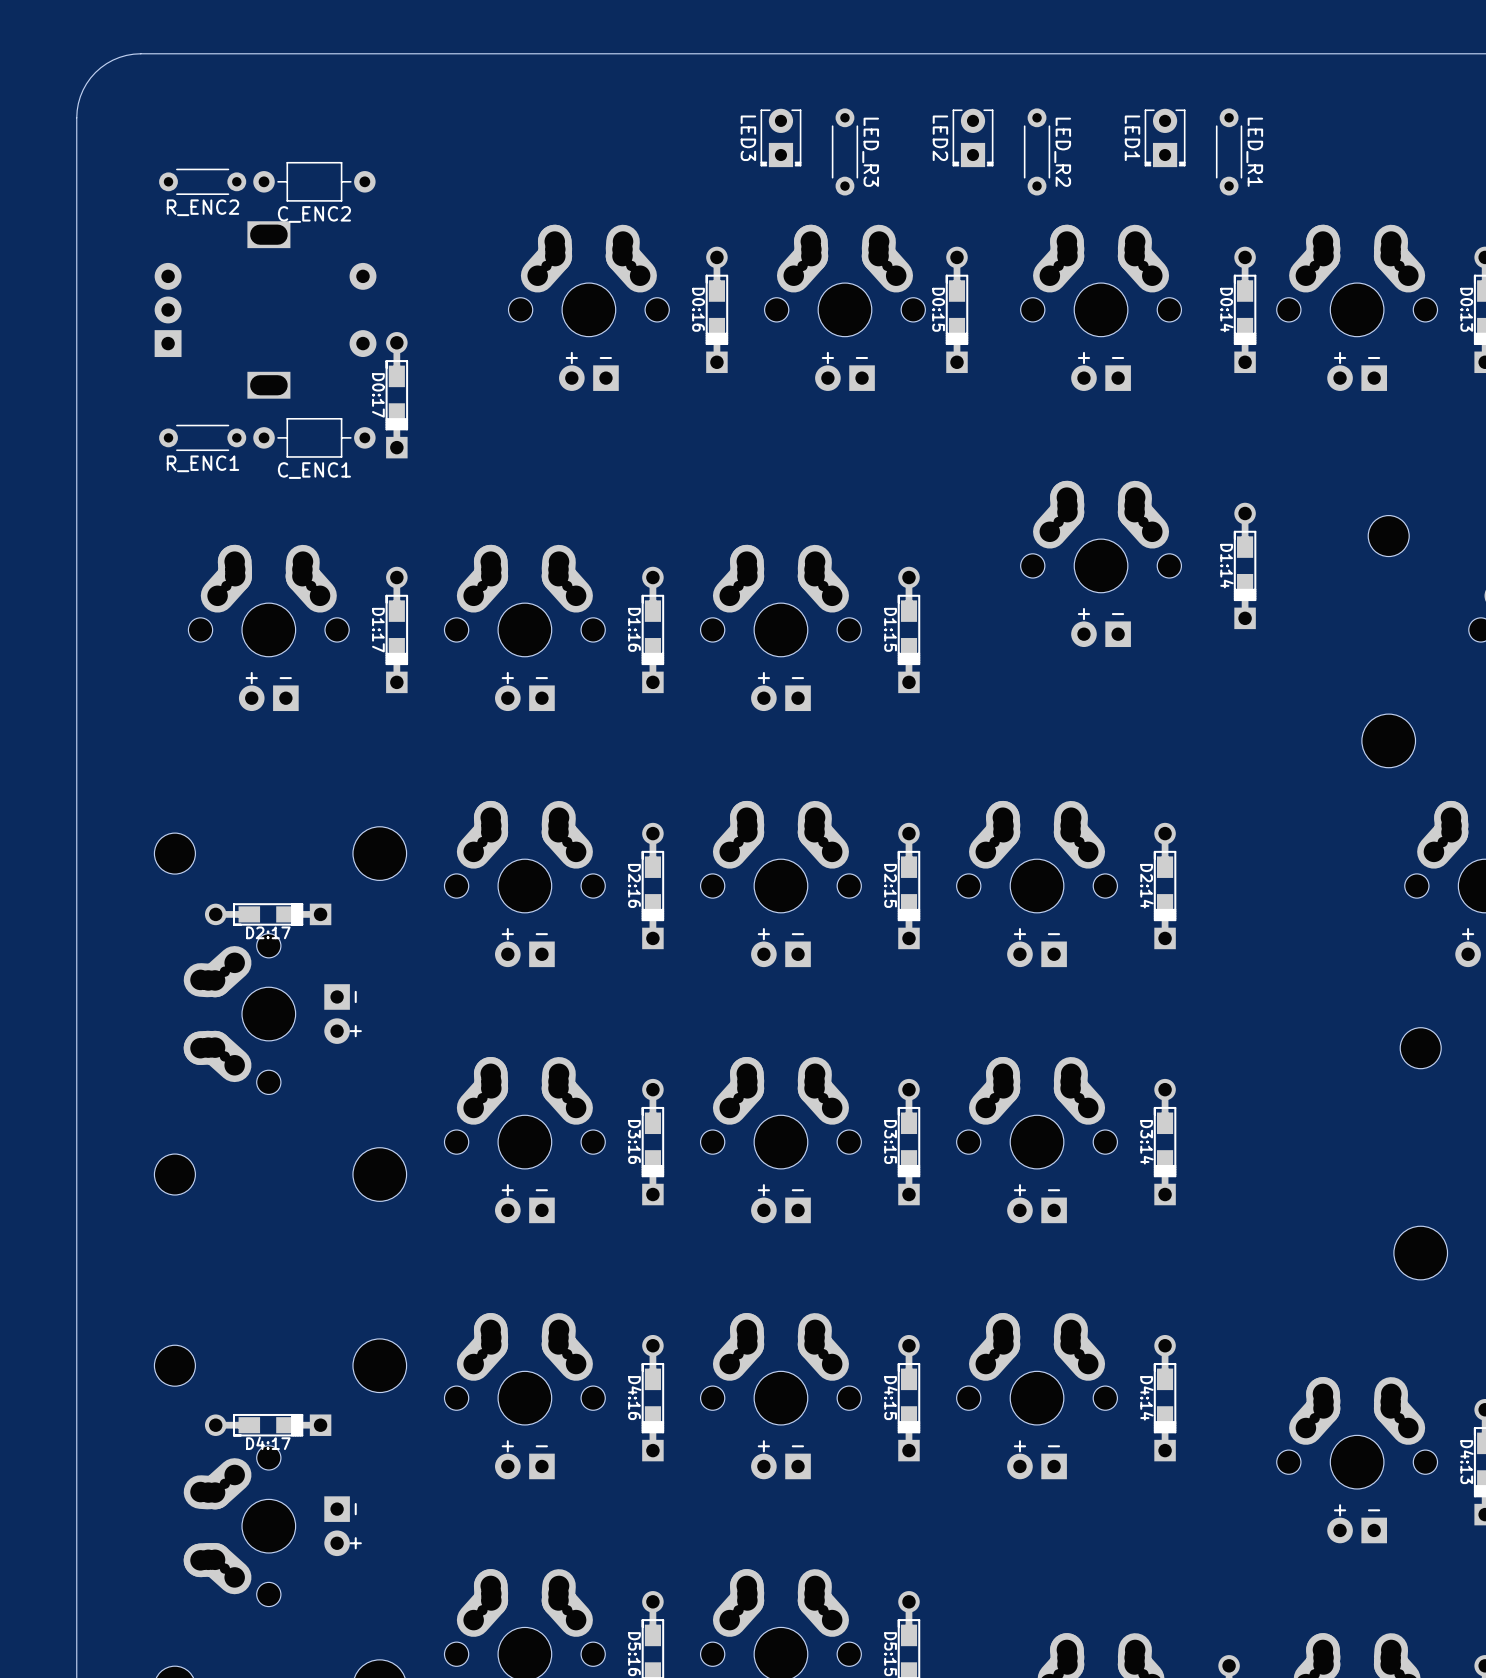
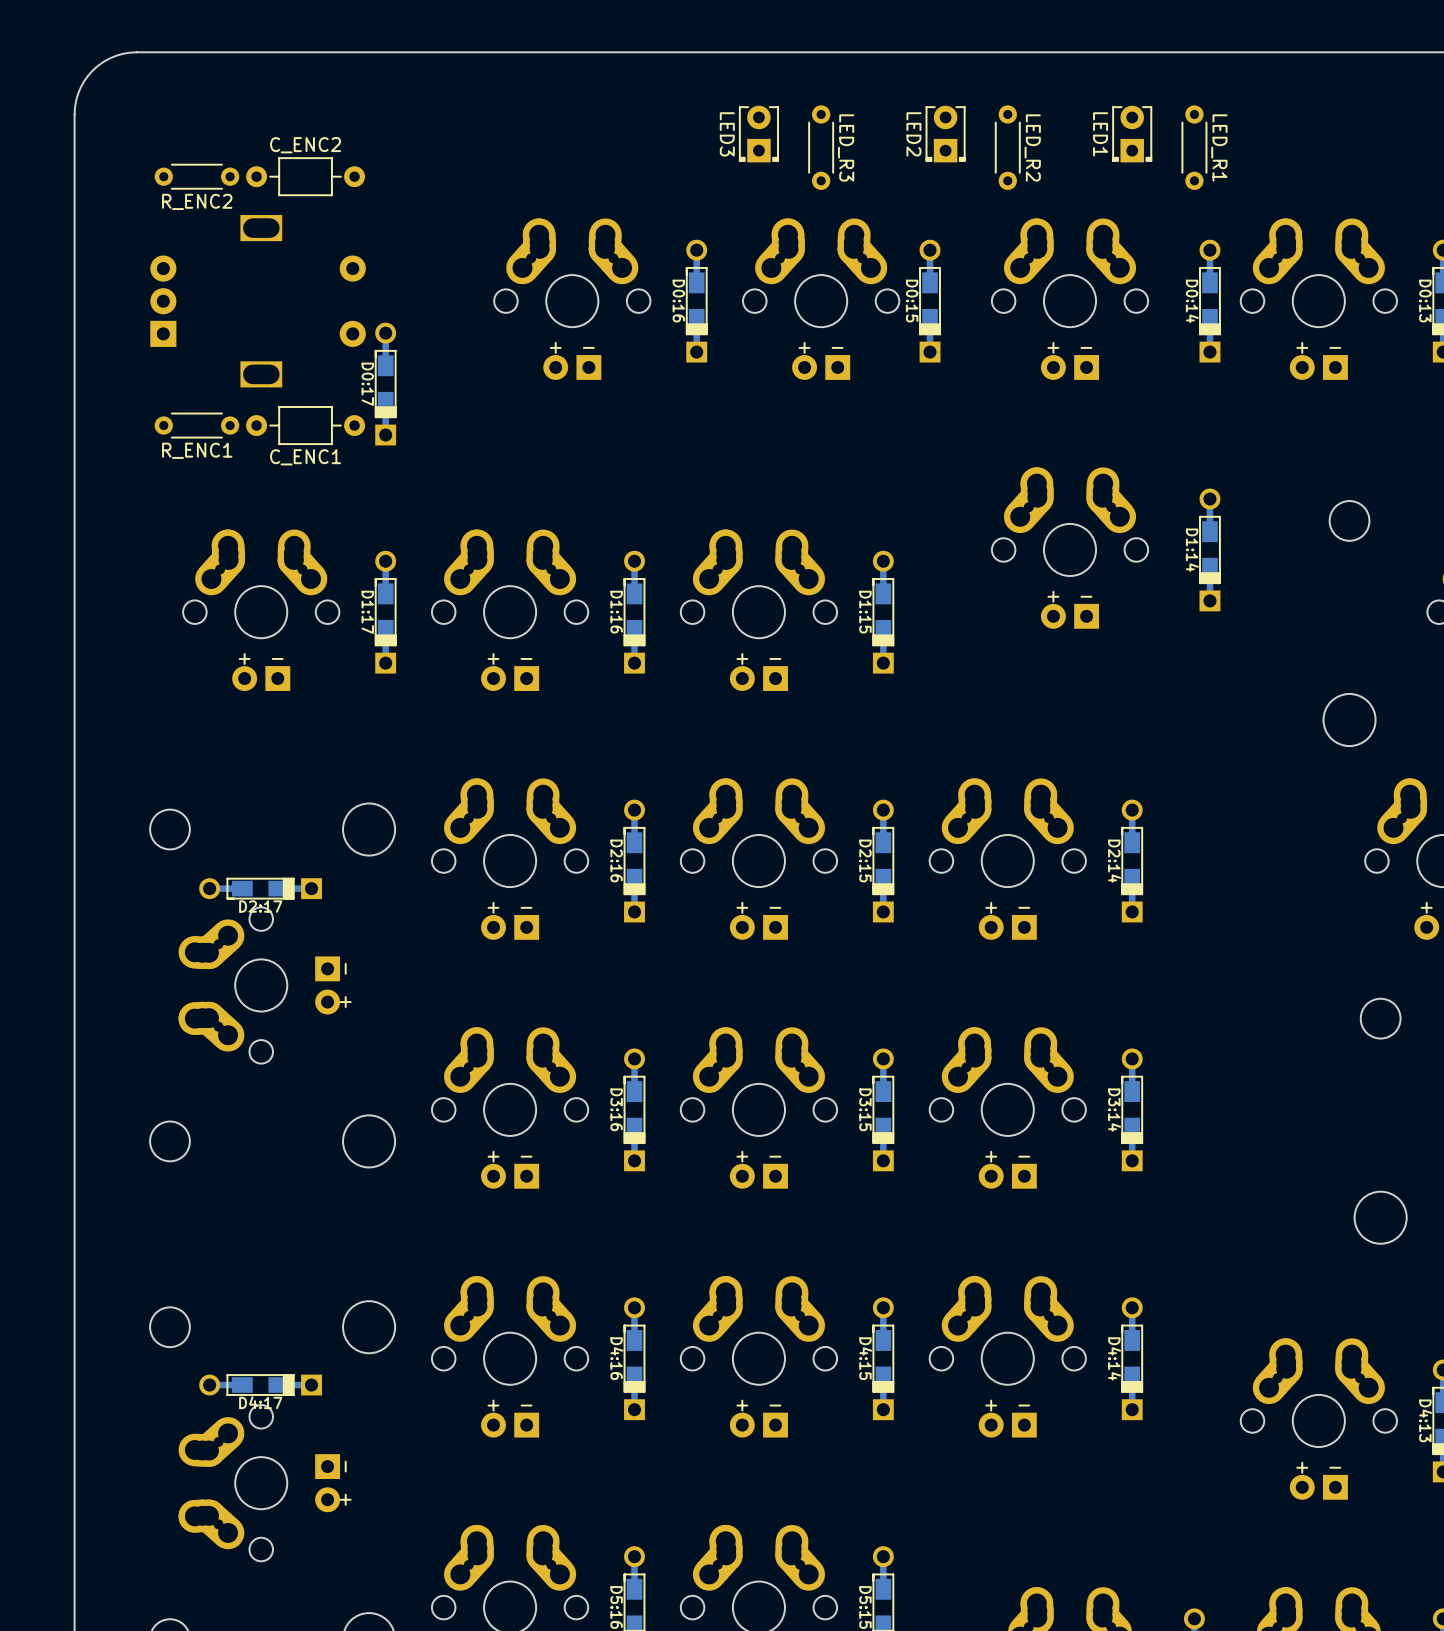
C_ENC2 name position: C_ENC2 (314, 214) -> C_ENC2 (305, 145)

